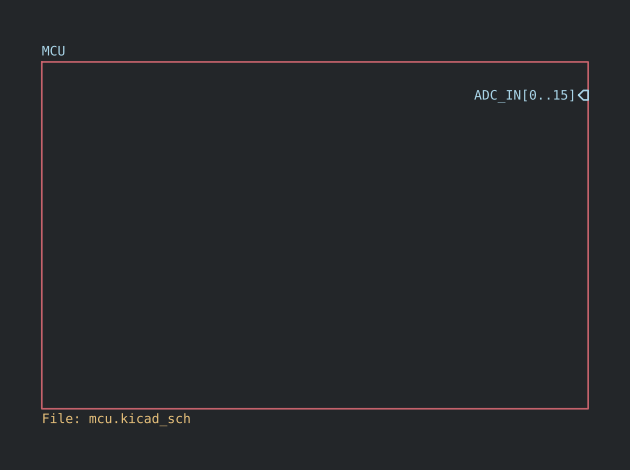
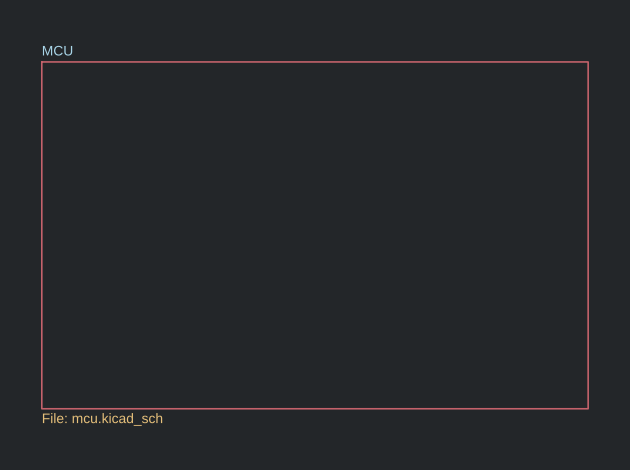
sheet pin: ADC_IN[0..15] (523, 96) -> none

